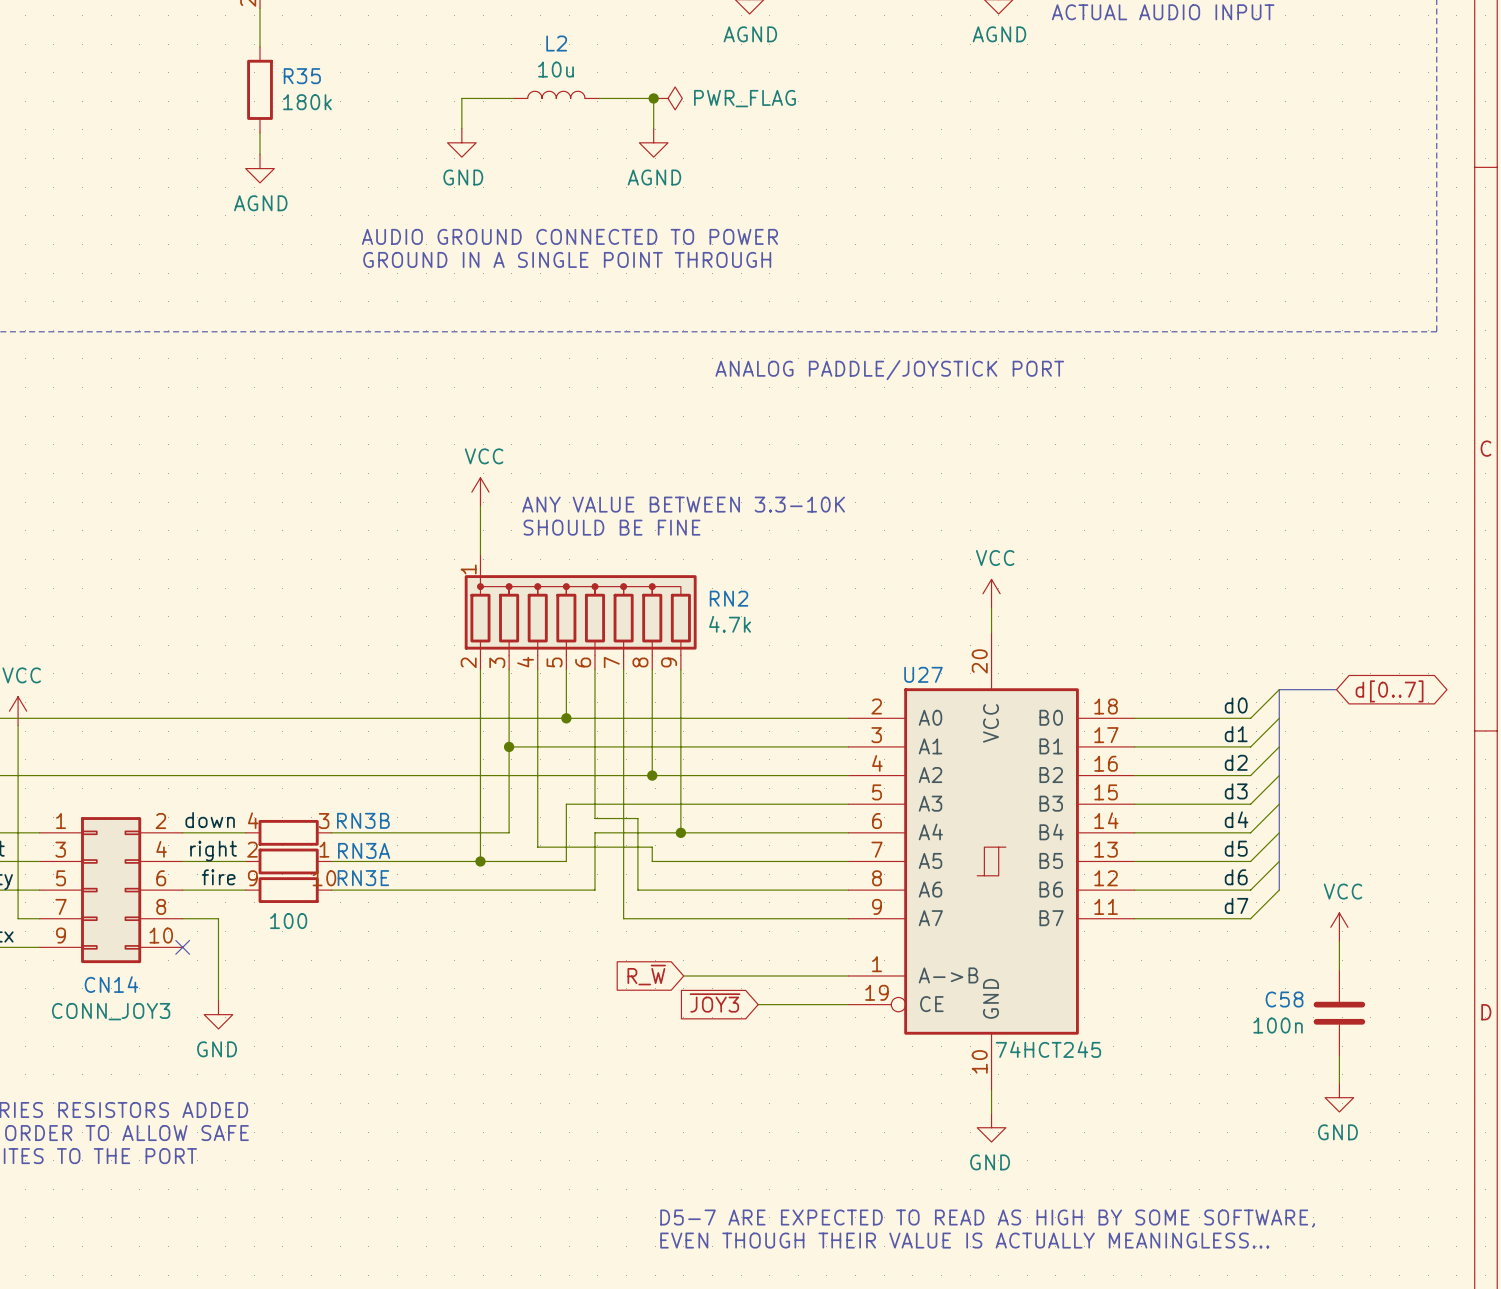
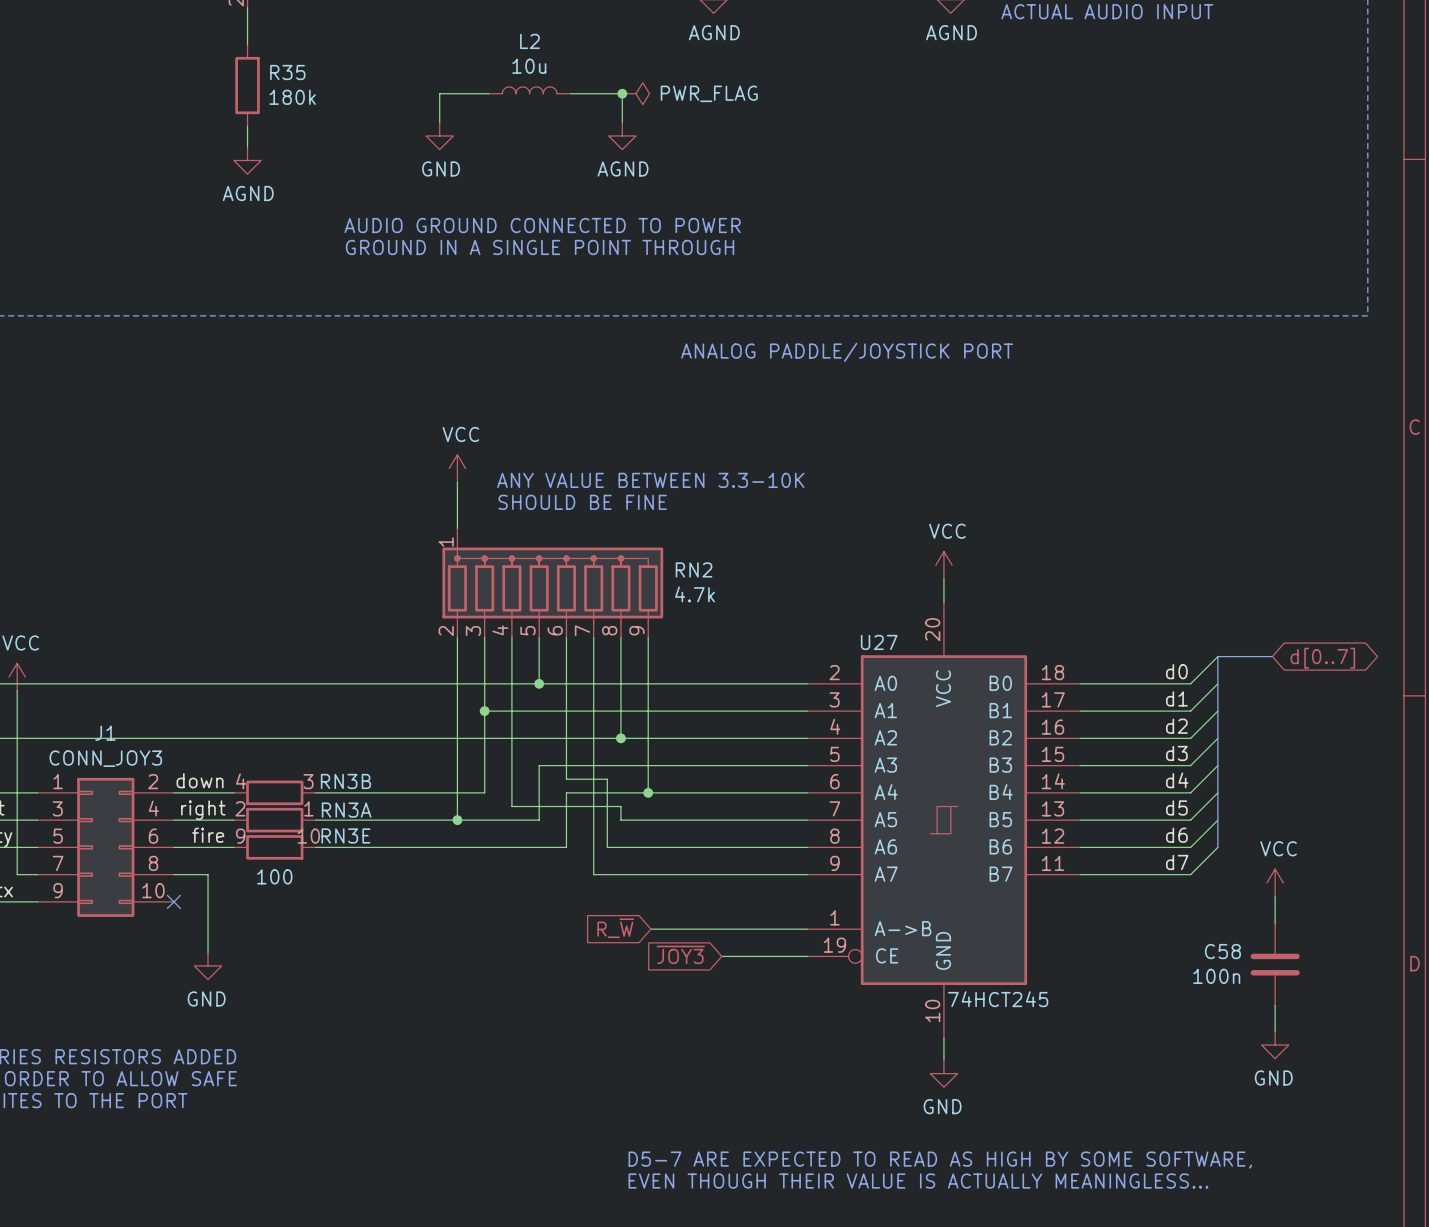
CN14 name: CN14 (111, 984) -> J1 (105, 733)
CN14 value position: CONN_JOY3 (111, 1011) -> CONN_JOY3 (105, 758)

